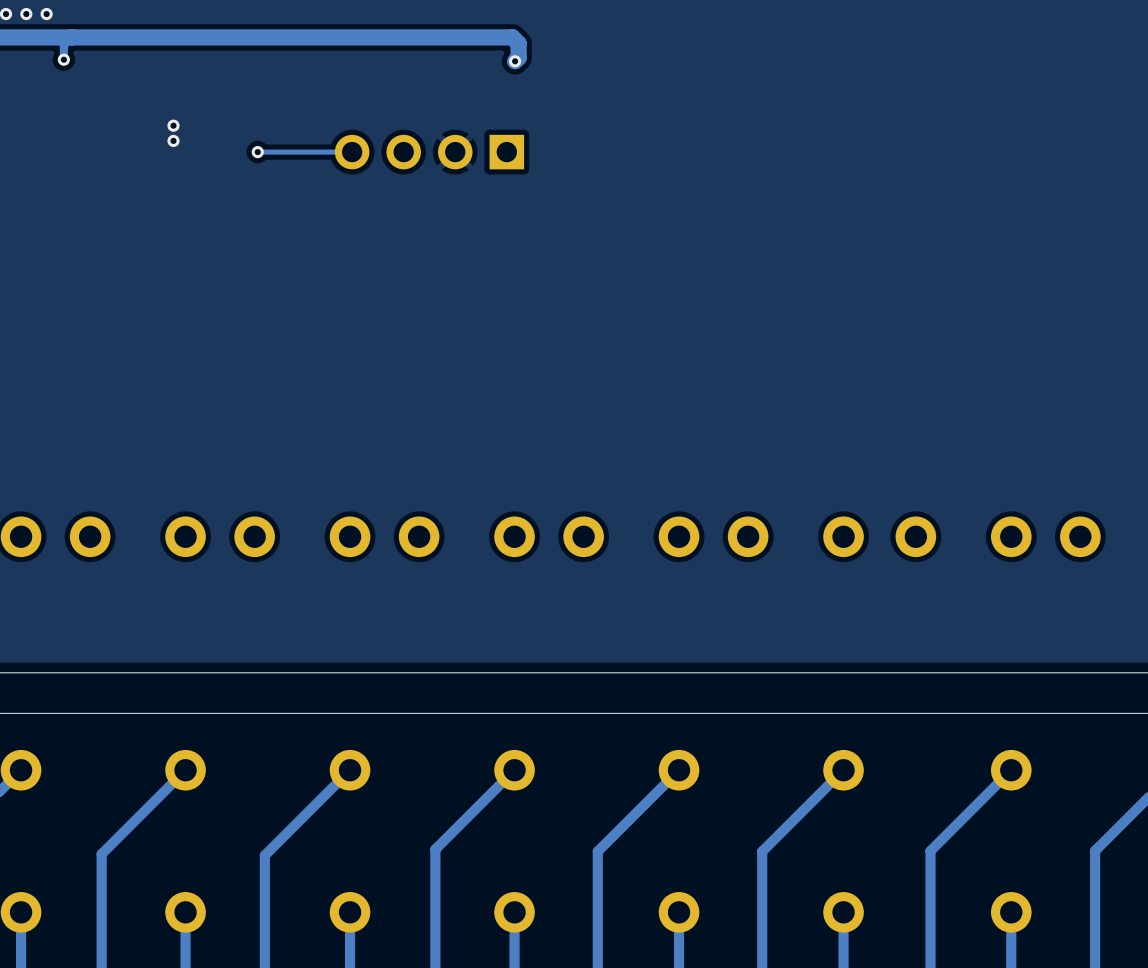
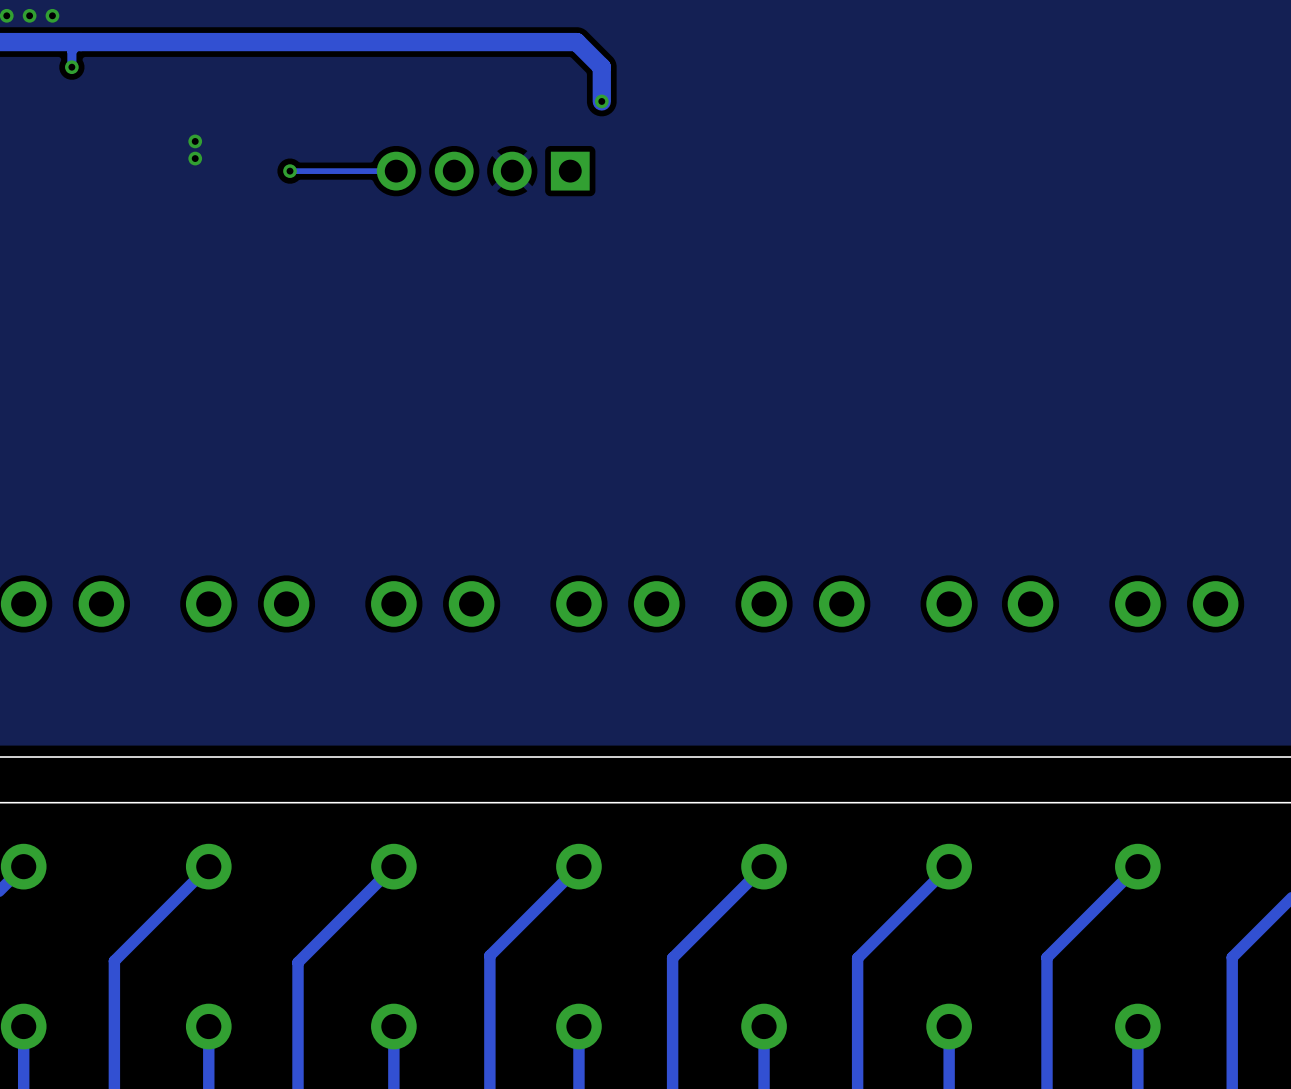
track: (518, 43) (518, 57) (515, 61) -> (583, 48) (601, 67) (601, 101)
via position: (515, 61) -> (601, 101)

